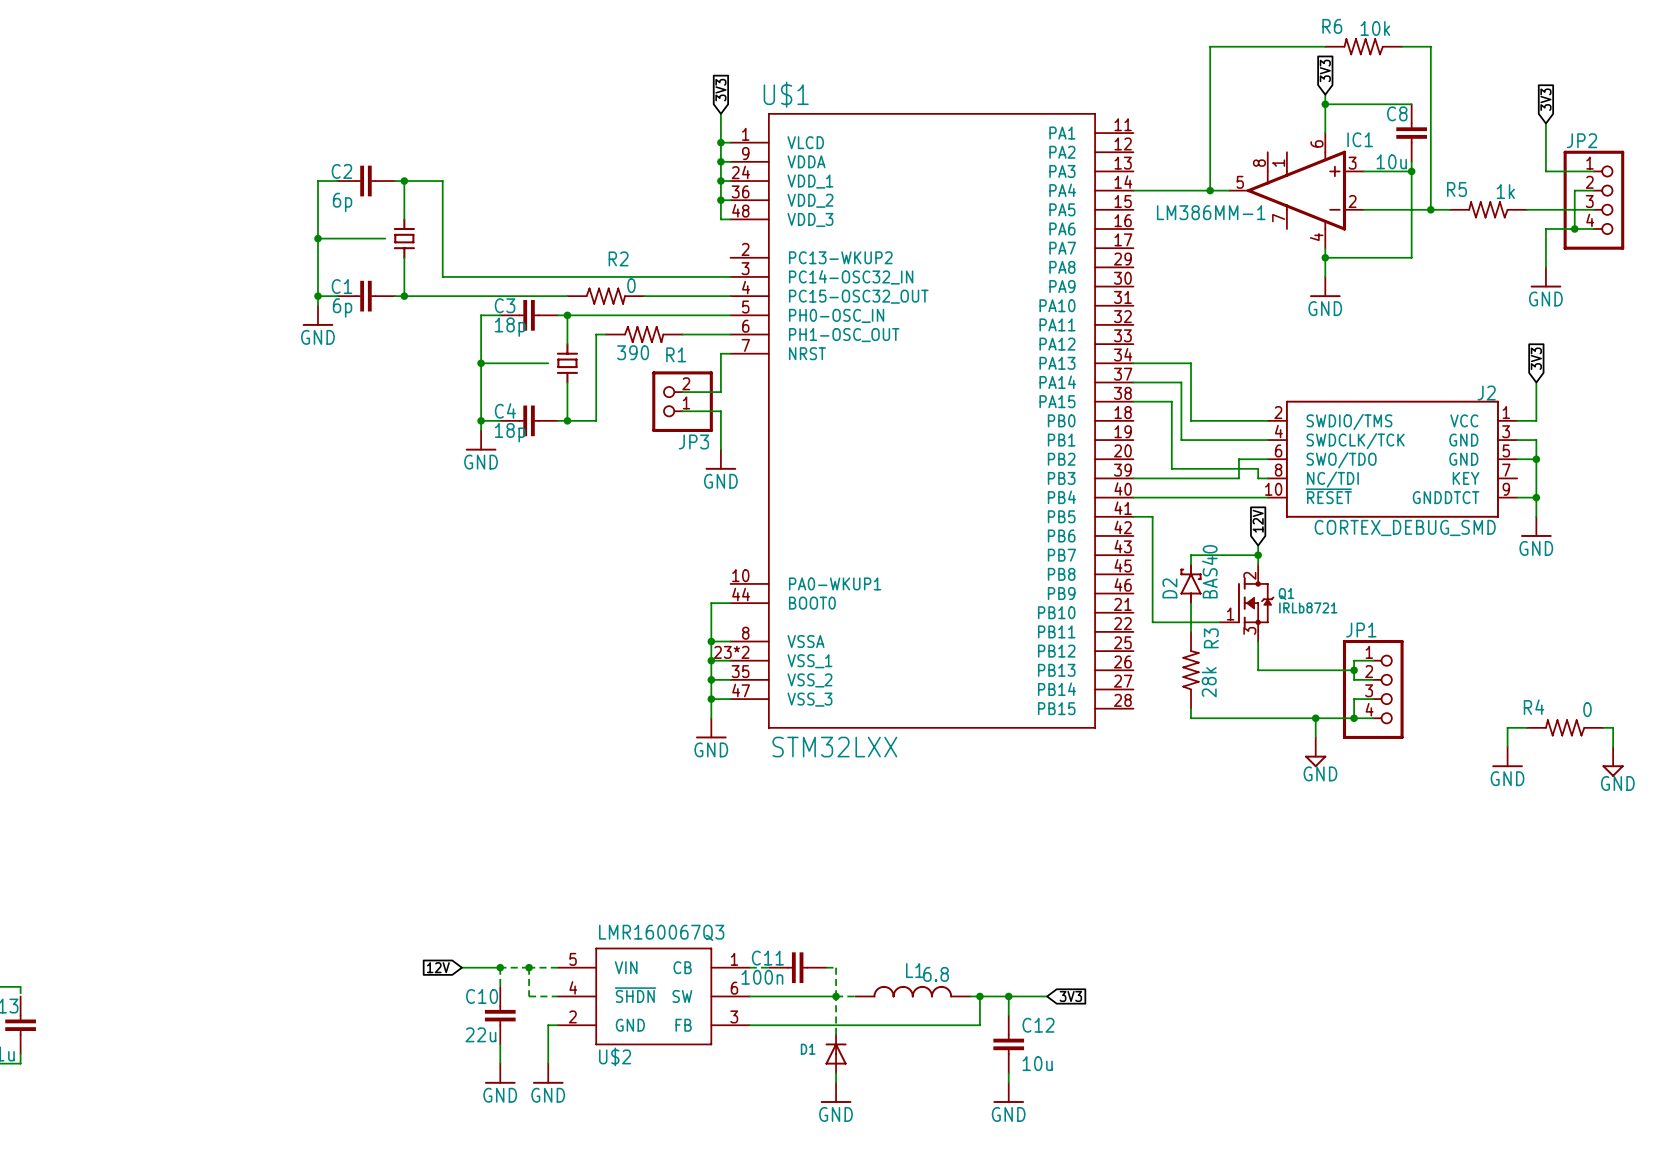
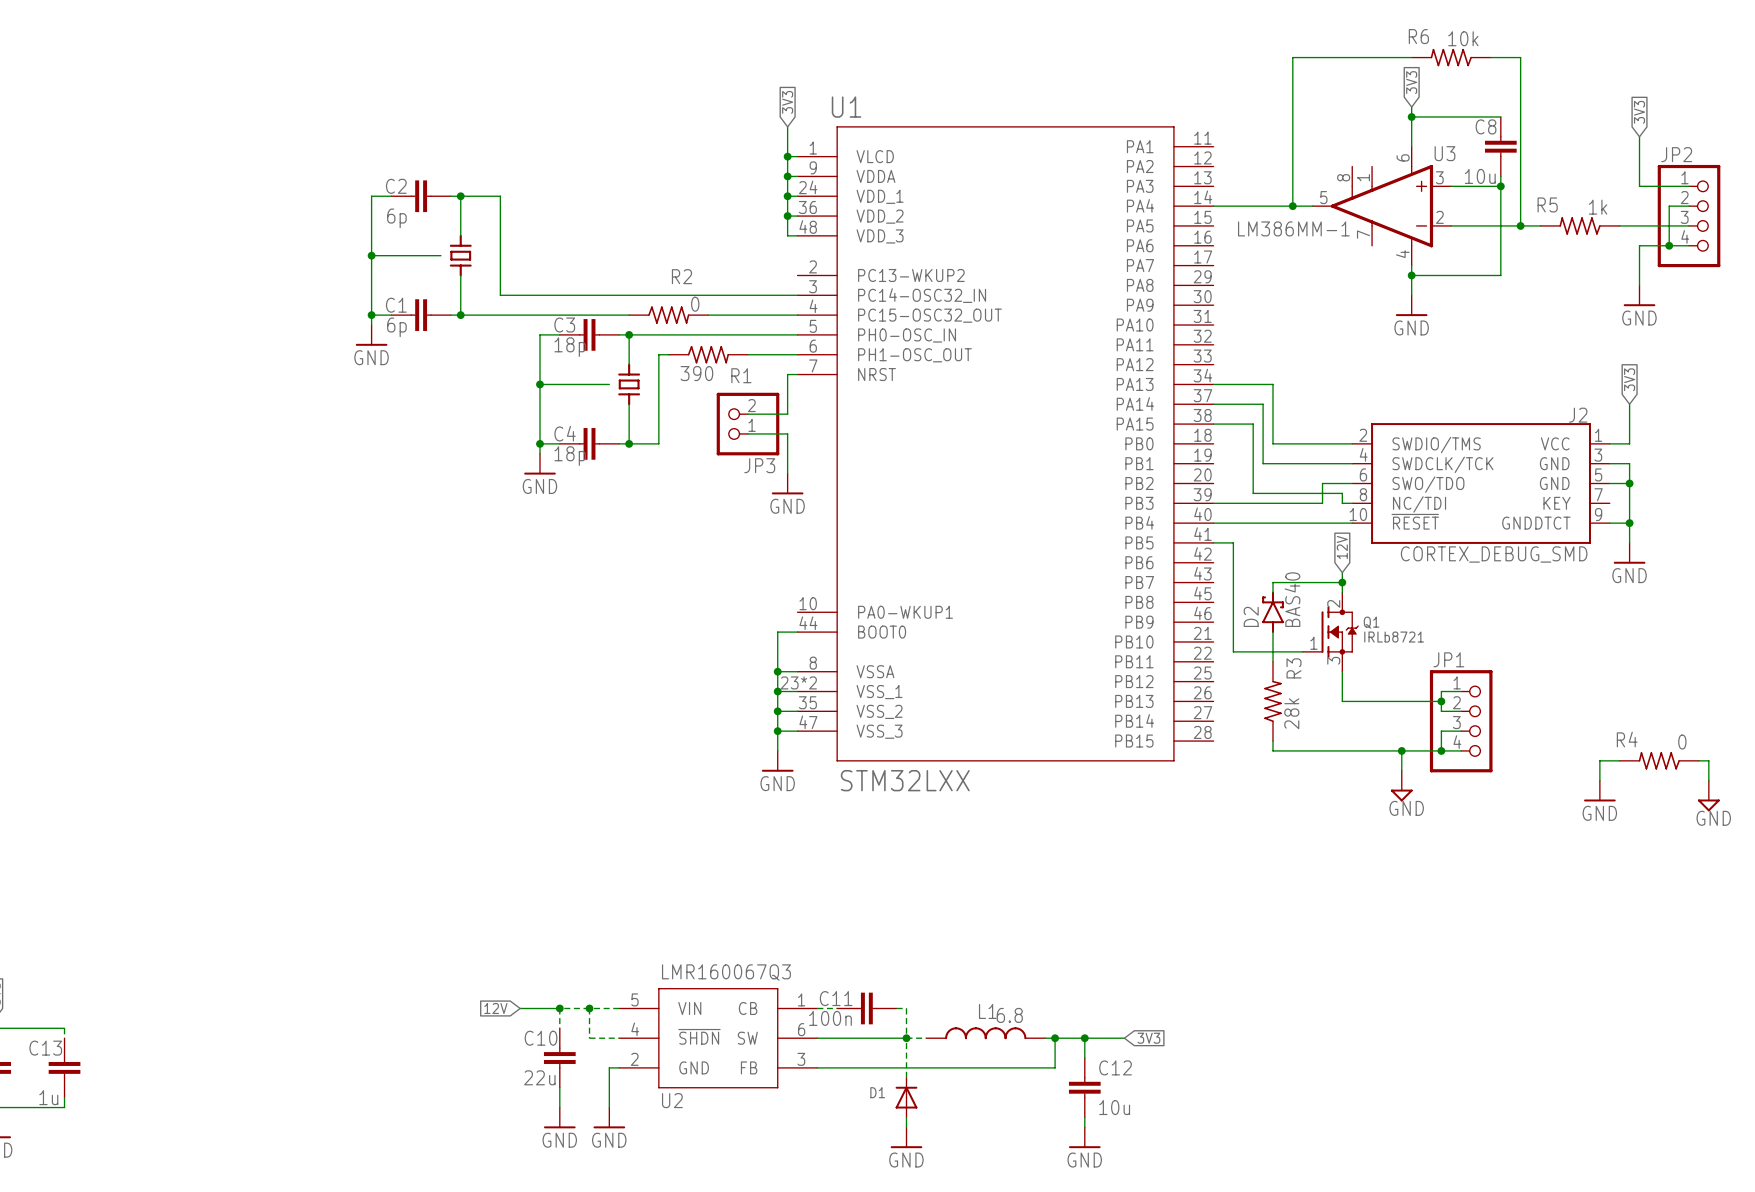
U$1 name: U$1 (786, 94) -> U1 (846, 107)
IC1 name: IC1 (1360, 139) -> U3 (1444, 153)
U$2 name: U$2 (615, 1056) -> U2 (672, 1100)

